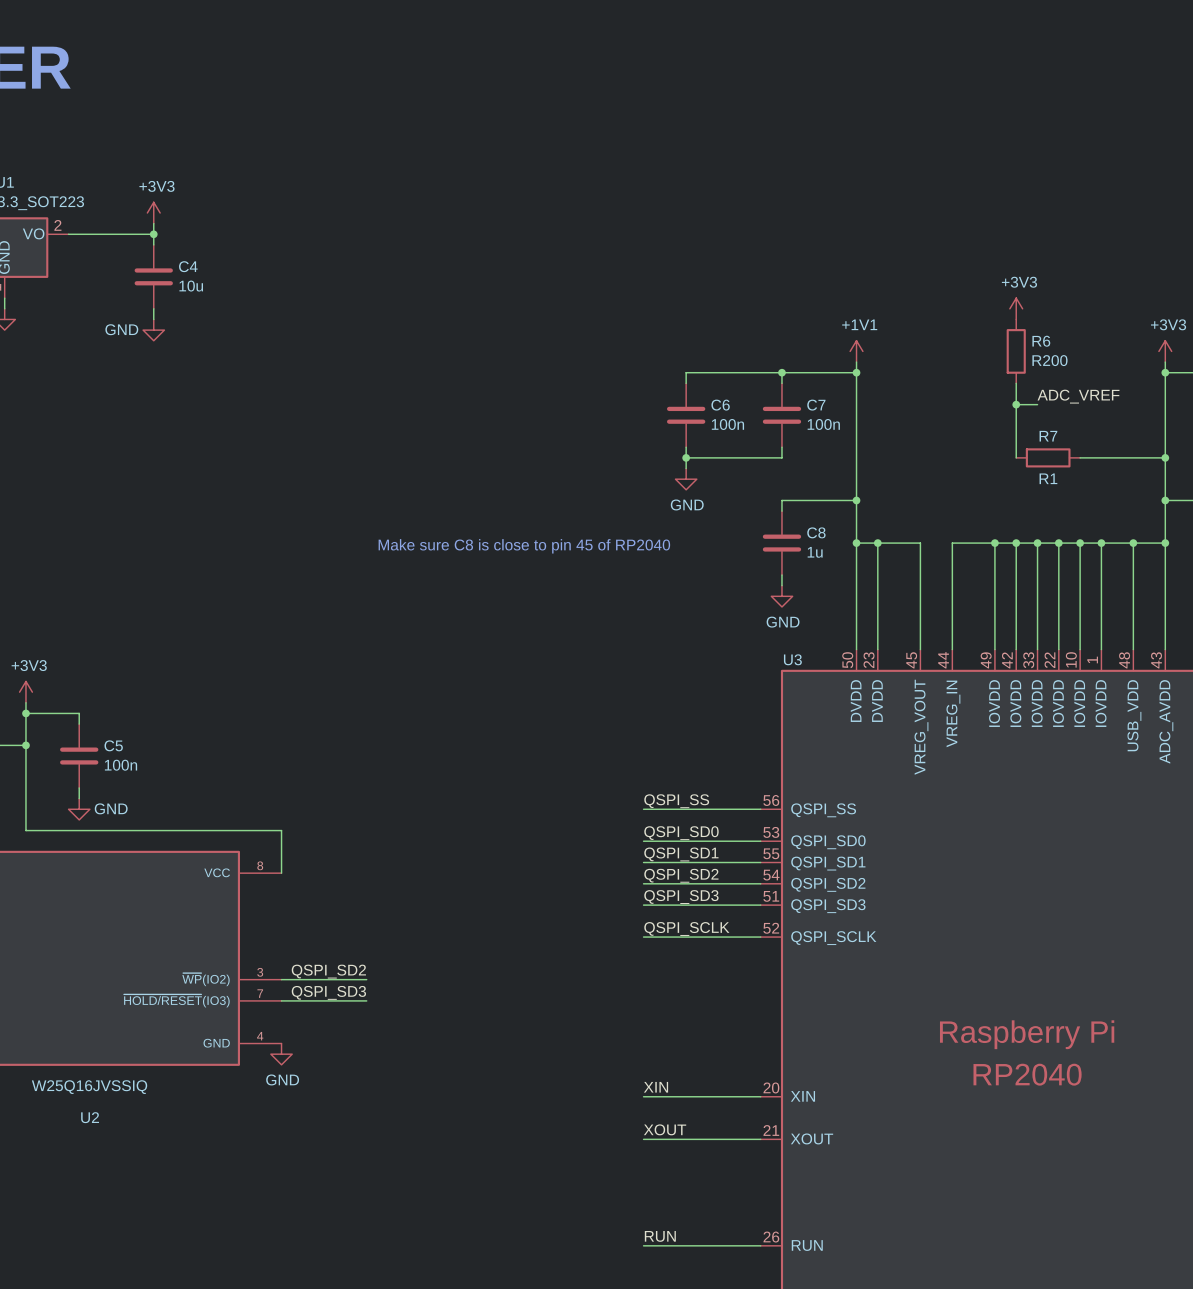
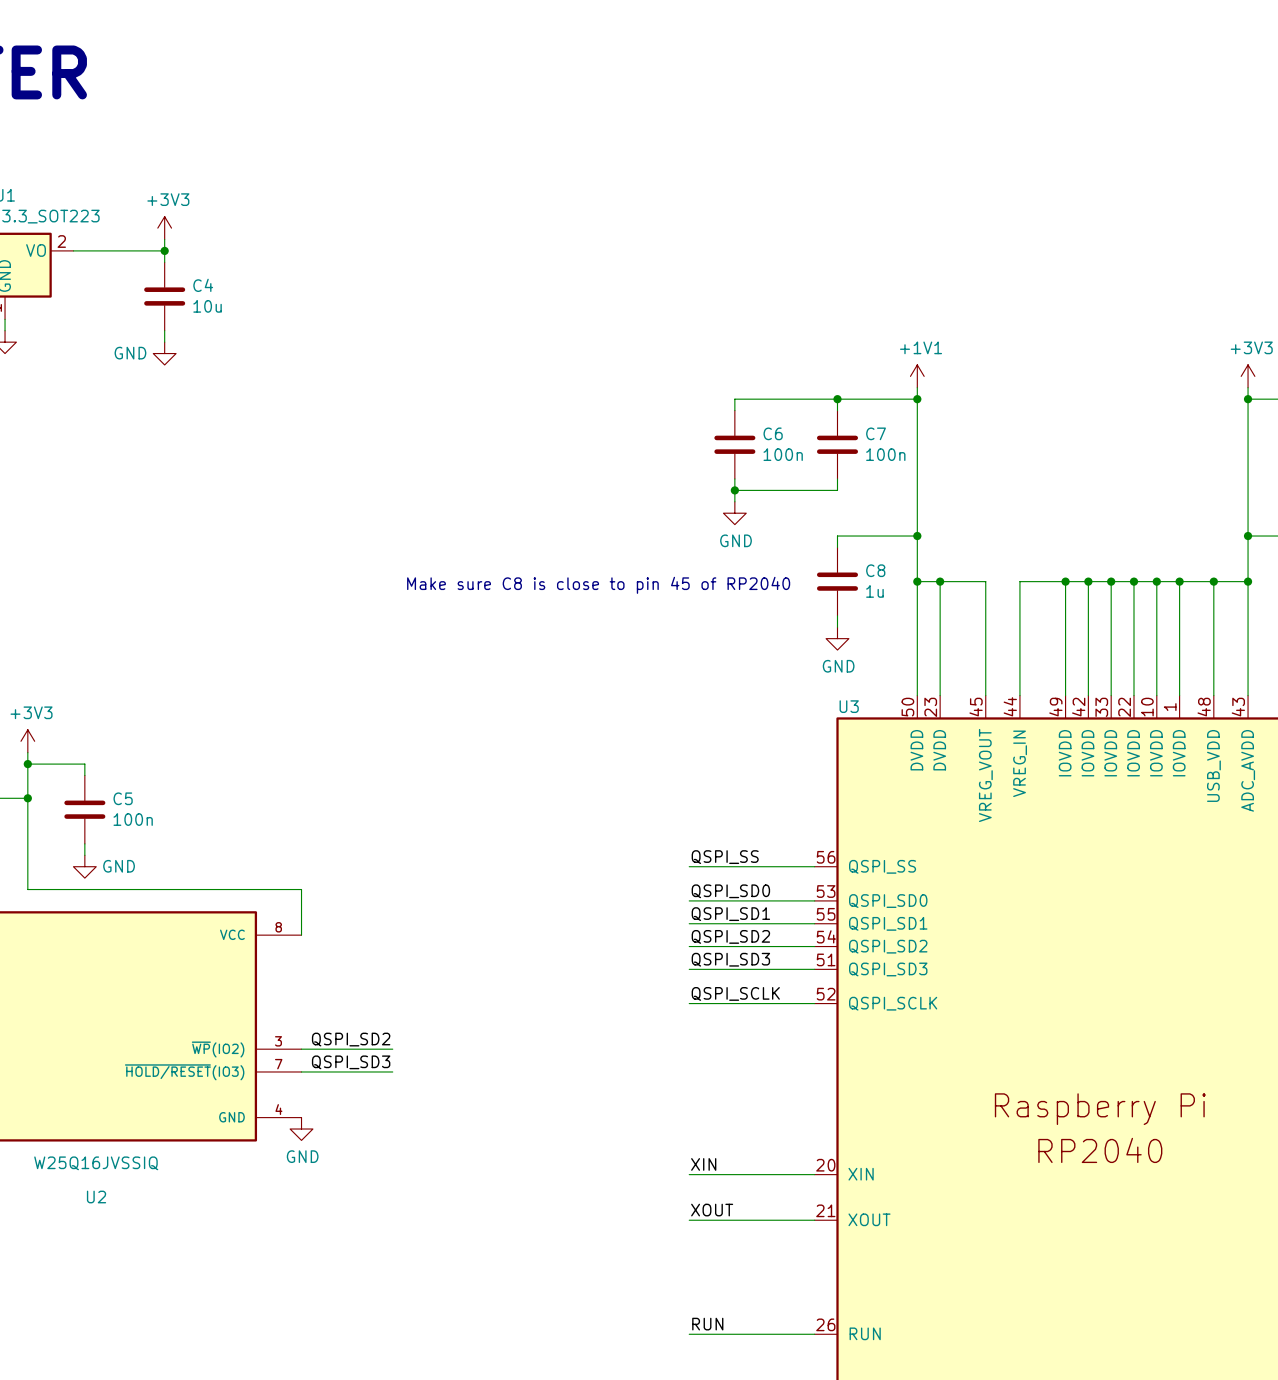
power symbol: +3V3 (1016, 308) -> none
R6: R200 (1016, 351) -> none
wire: (1016, 383) (1016, 457) -> none
label: ADC_VREF (1078, 396) -> none
wire: (1016, 404) (1037, 404) -> none
junction: (1016, 404) -> none
R7: R1 (1048, 457) -> none
wire: (1080, 457) (1165, 457) -> none
junction: (1165, 457) -> none

